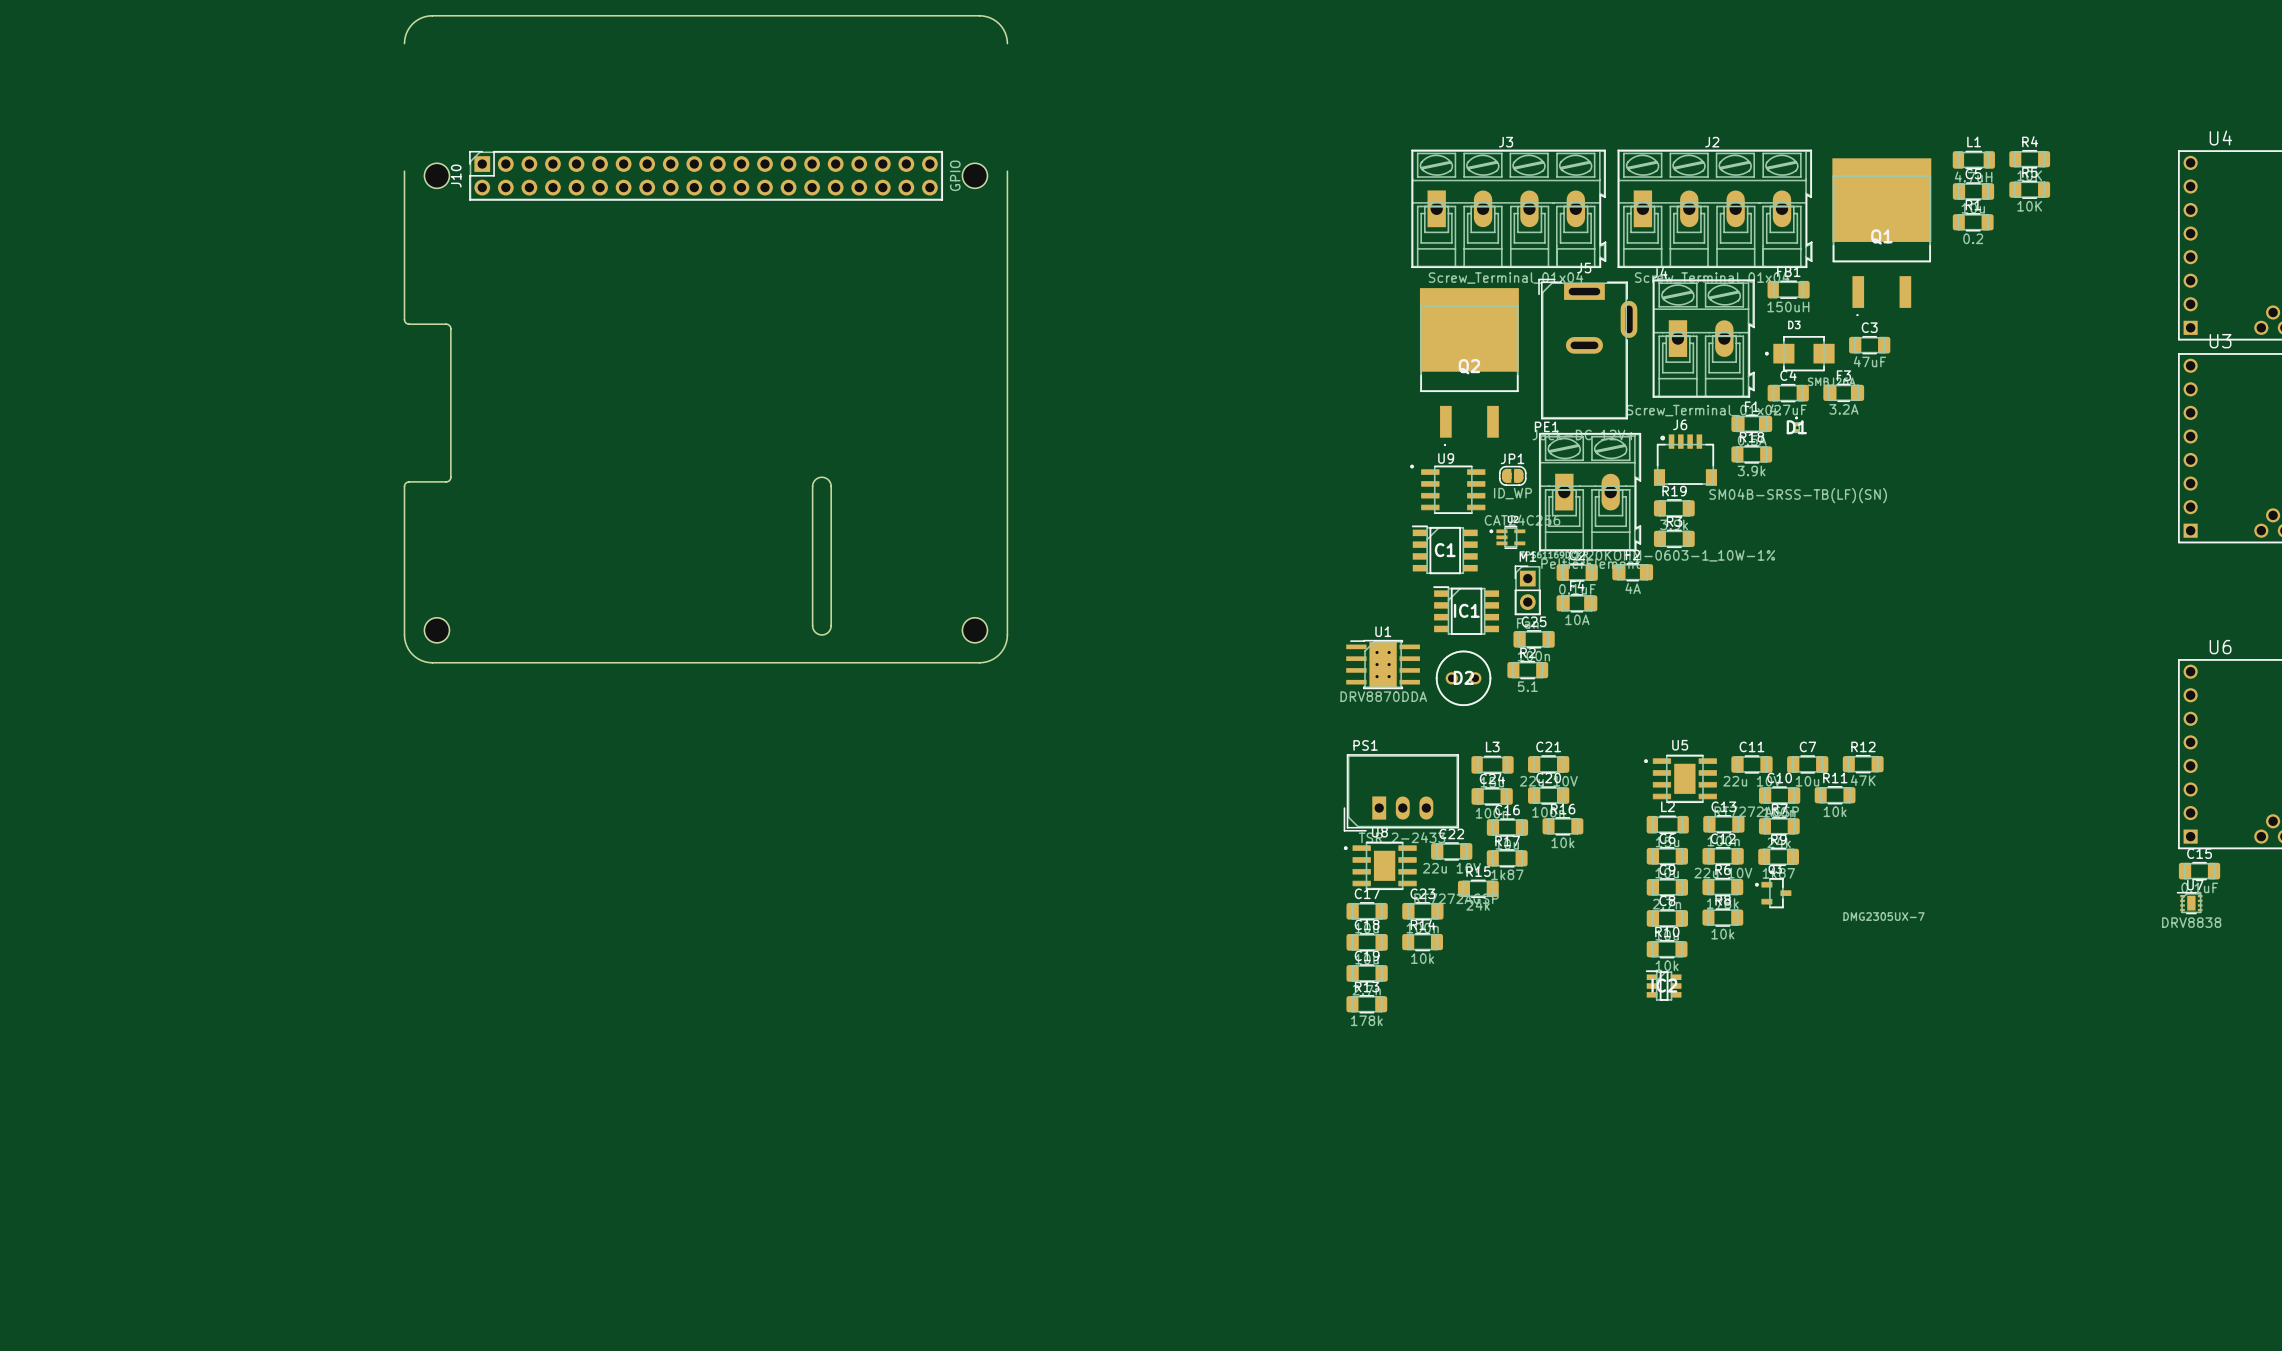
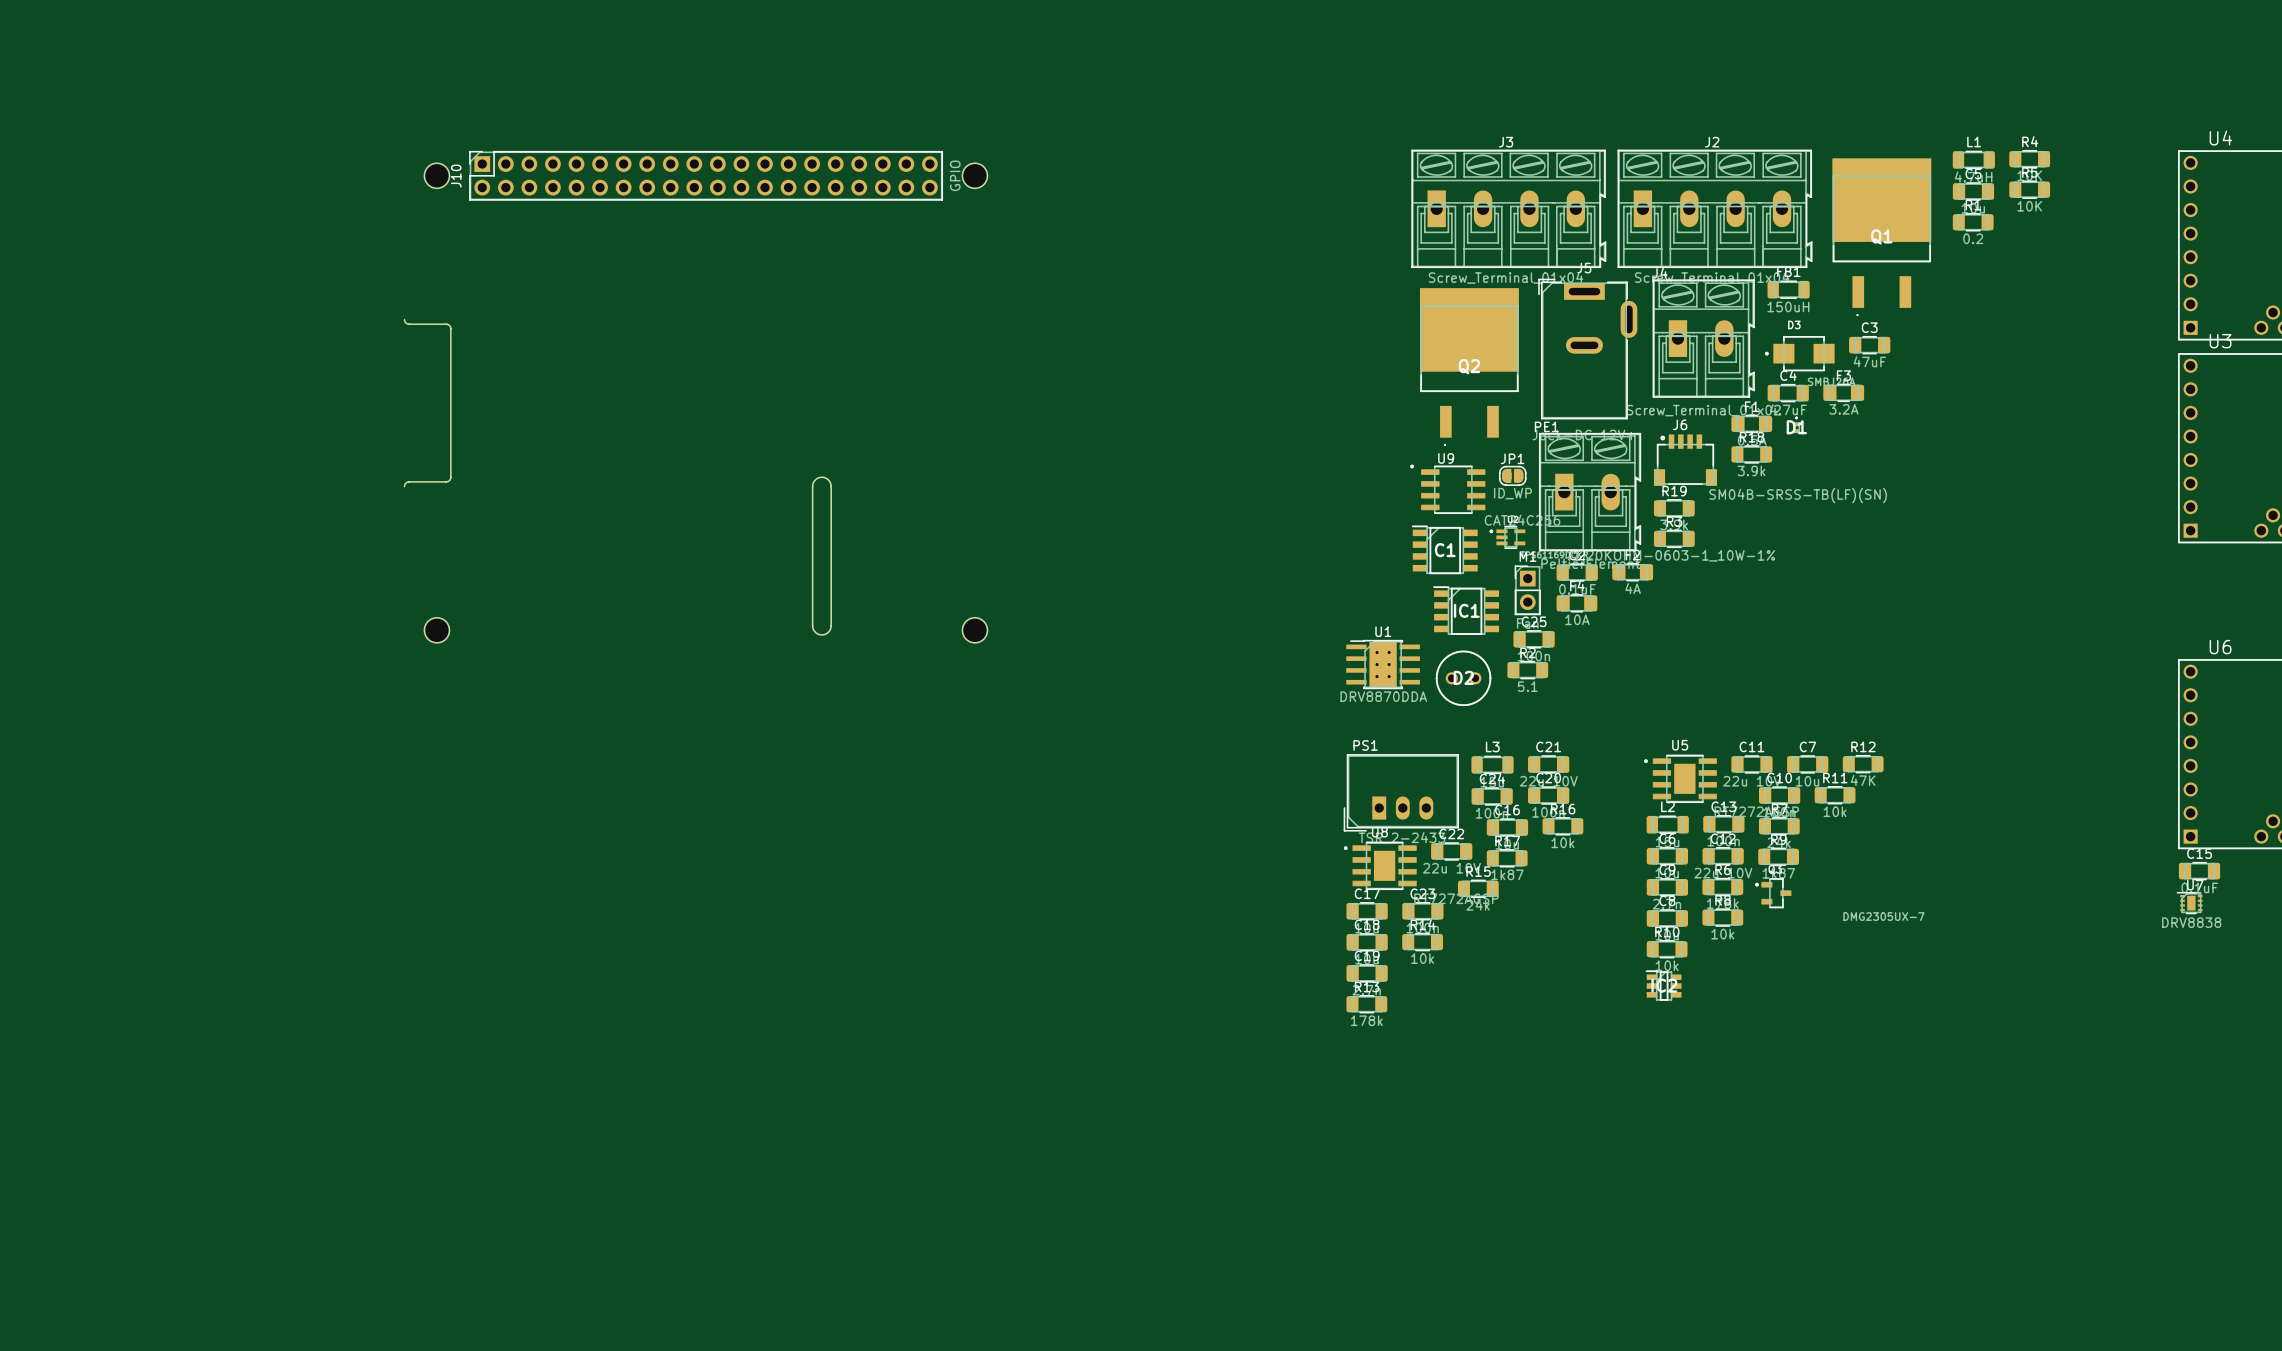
board edge: (404, 43) (406, 32) (412, 23) (421, 17) (432, 15) (979, 15) (990, 17) (999, 23) (1005, 32) (1007, 43) -> none
board edge: (404, 171) (404, 319) -> none
board edge: (1007, 171) (1007, 634) (1003, 648) (993, 659) (979, 662) (425, 661) (410, 651) (404, 638) (404, 486) -> none

